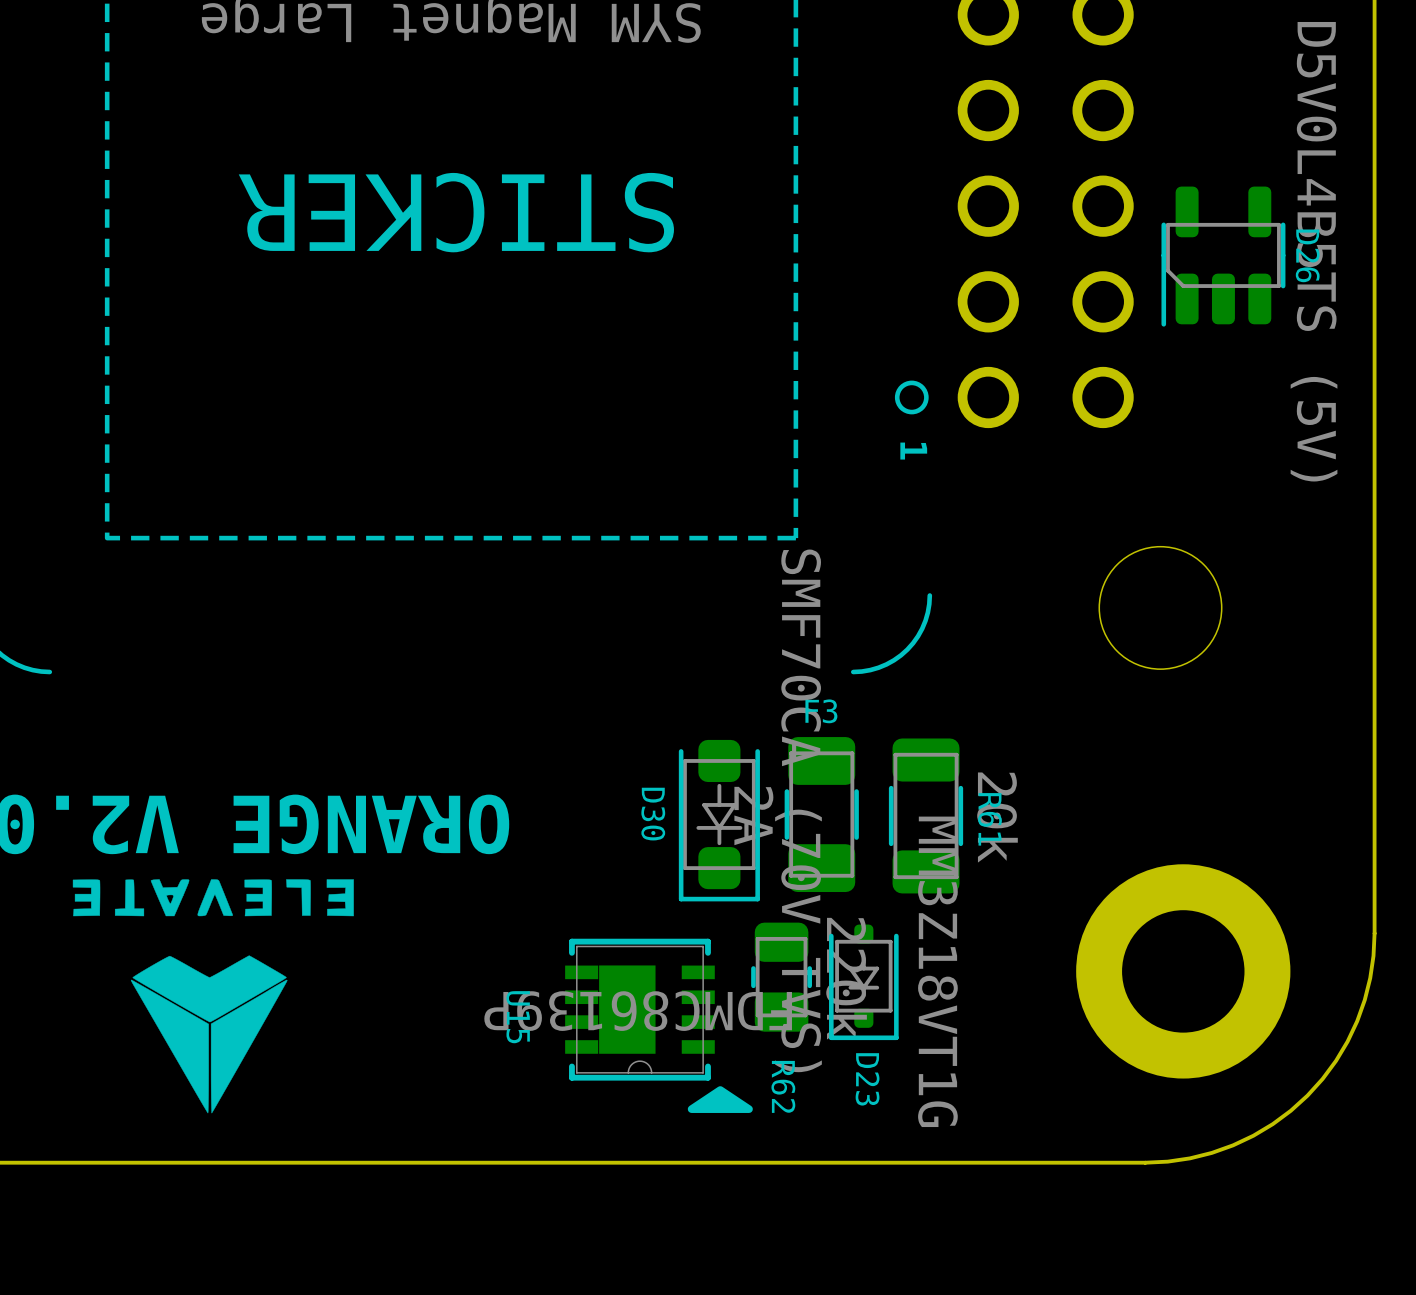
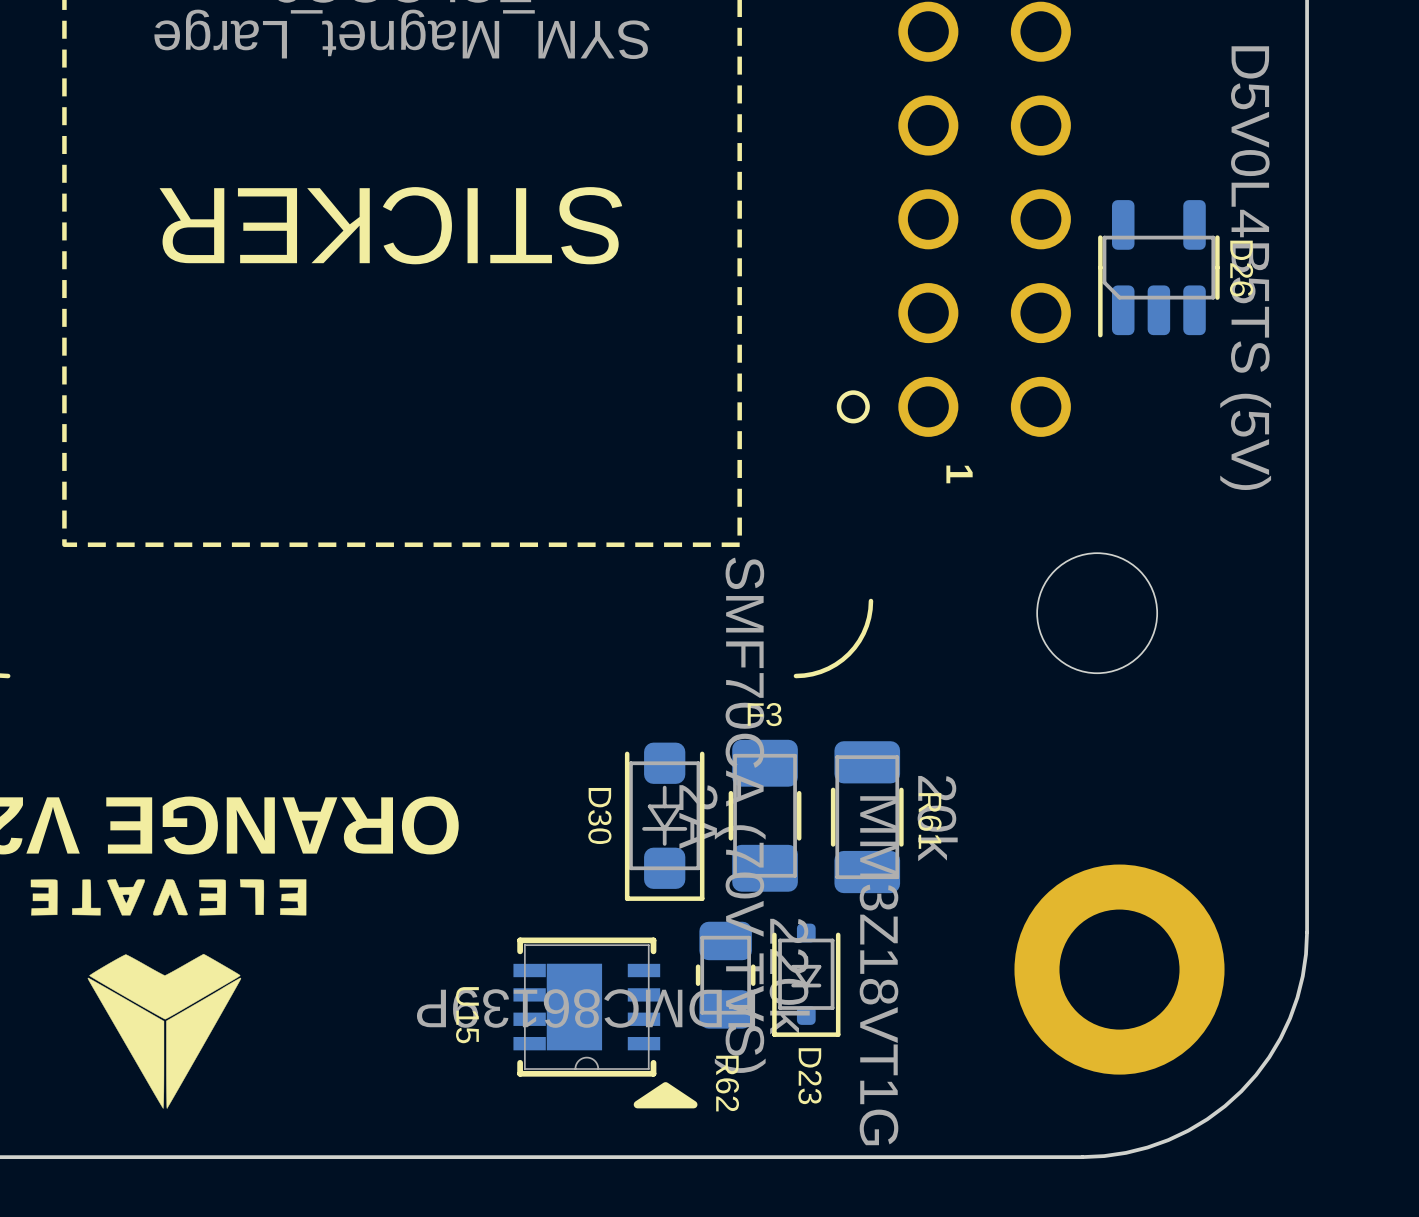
text position: 1 (913, 451) -> 1 (959, 474)

